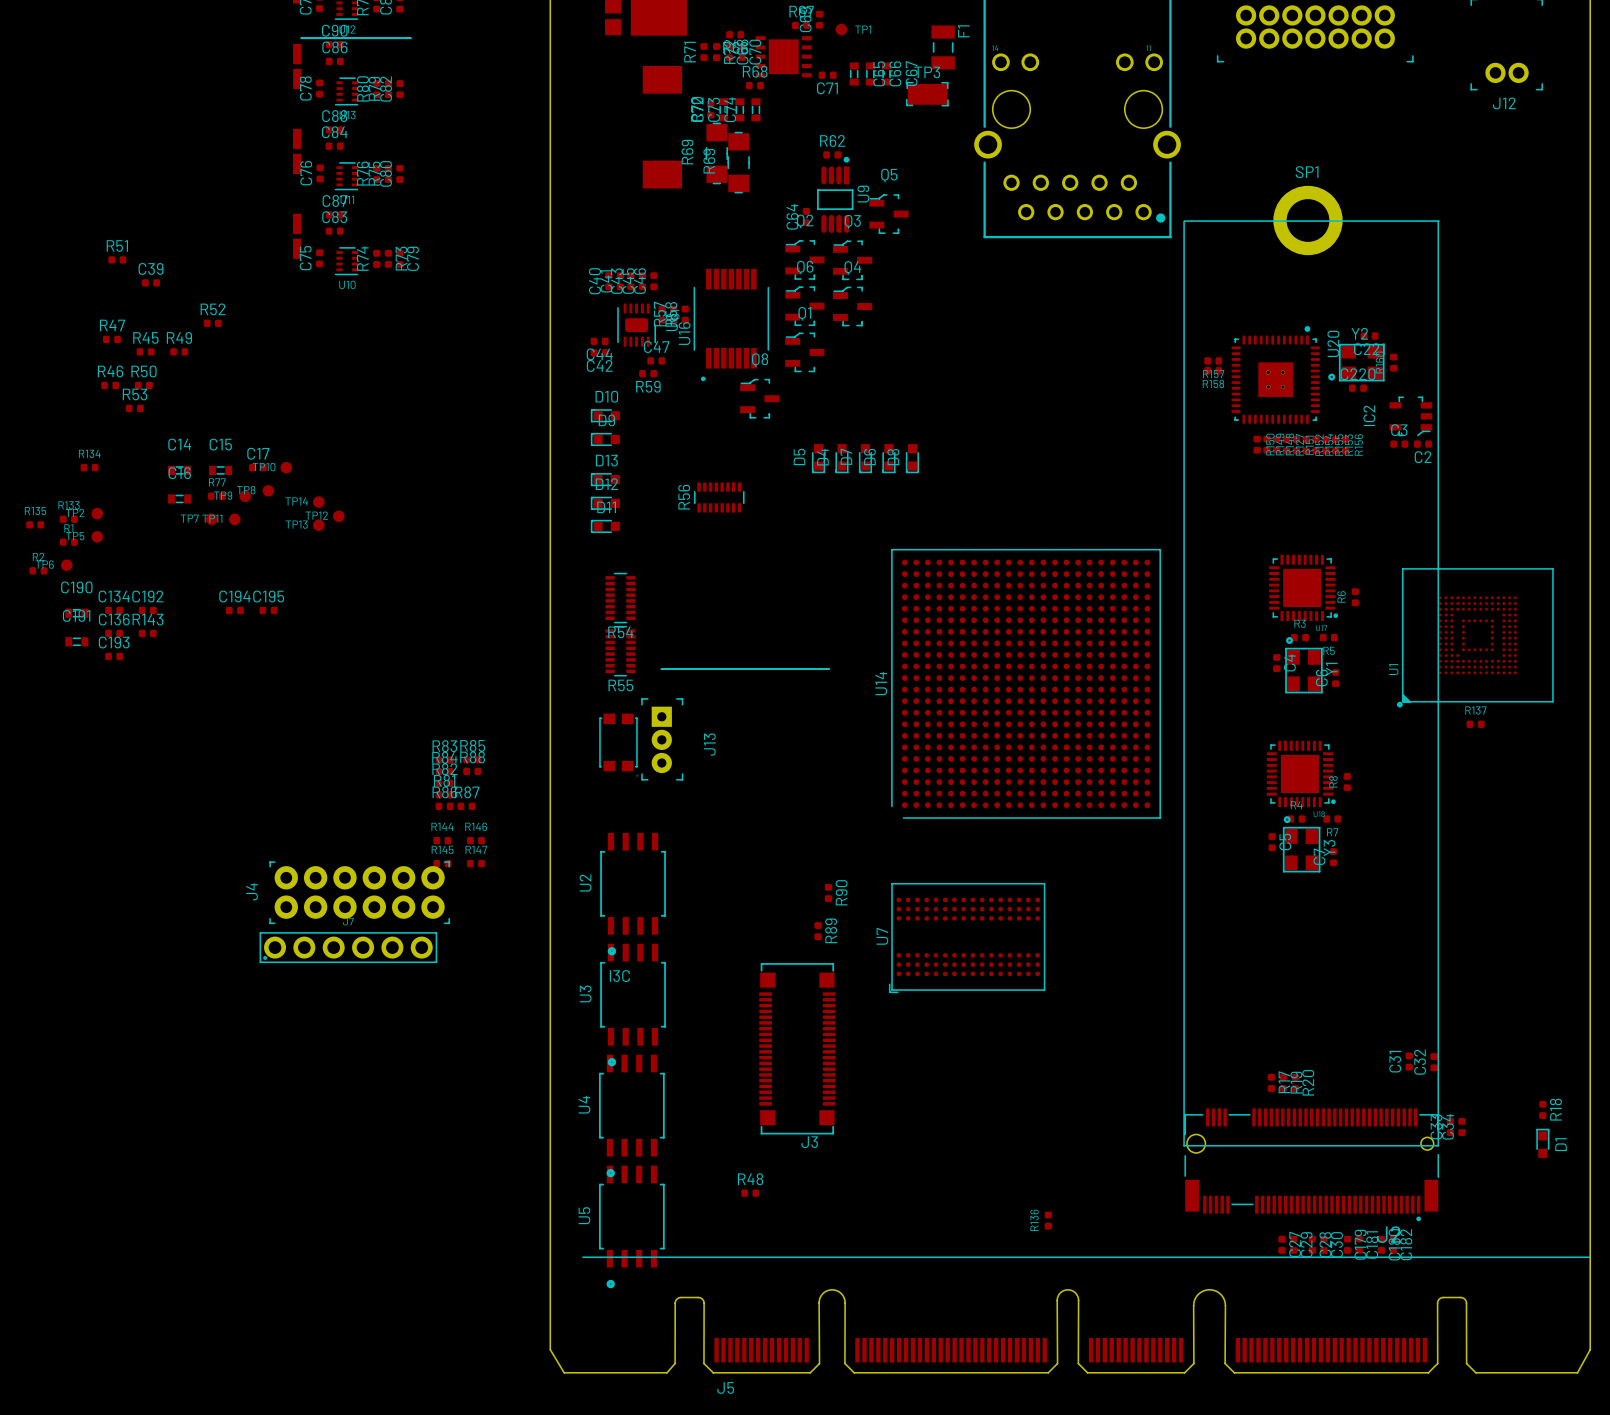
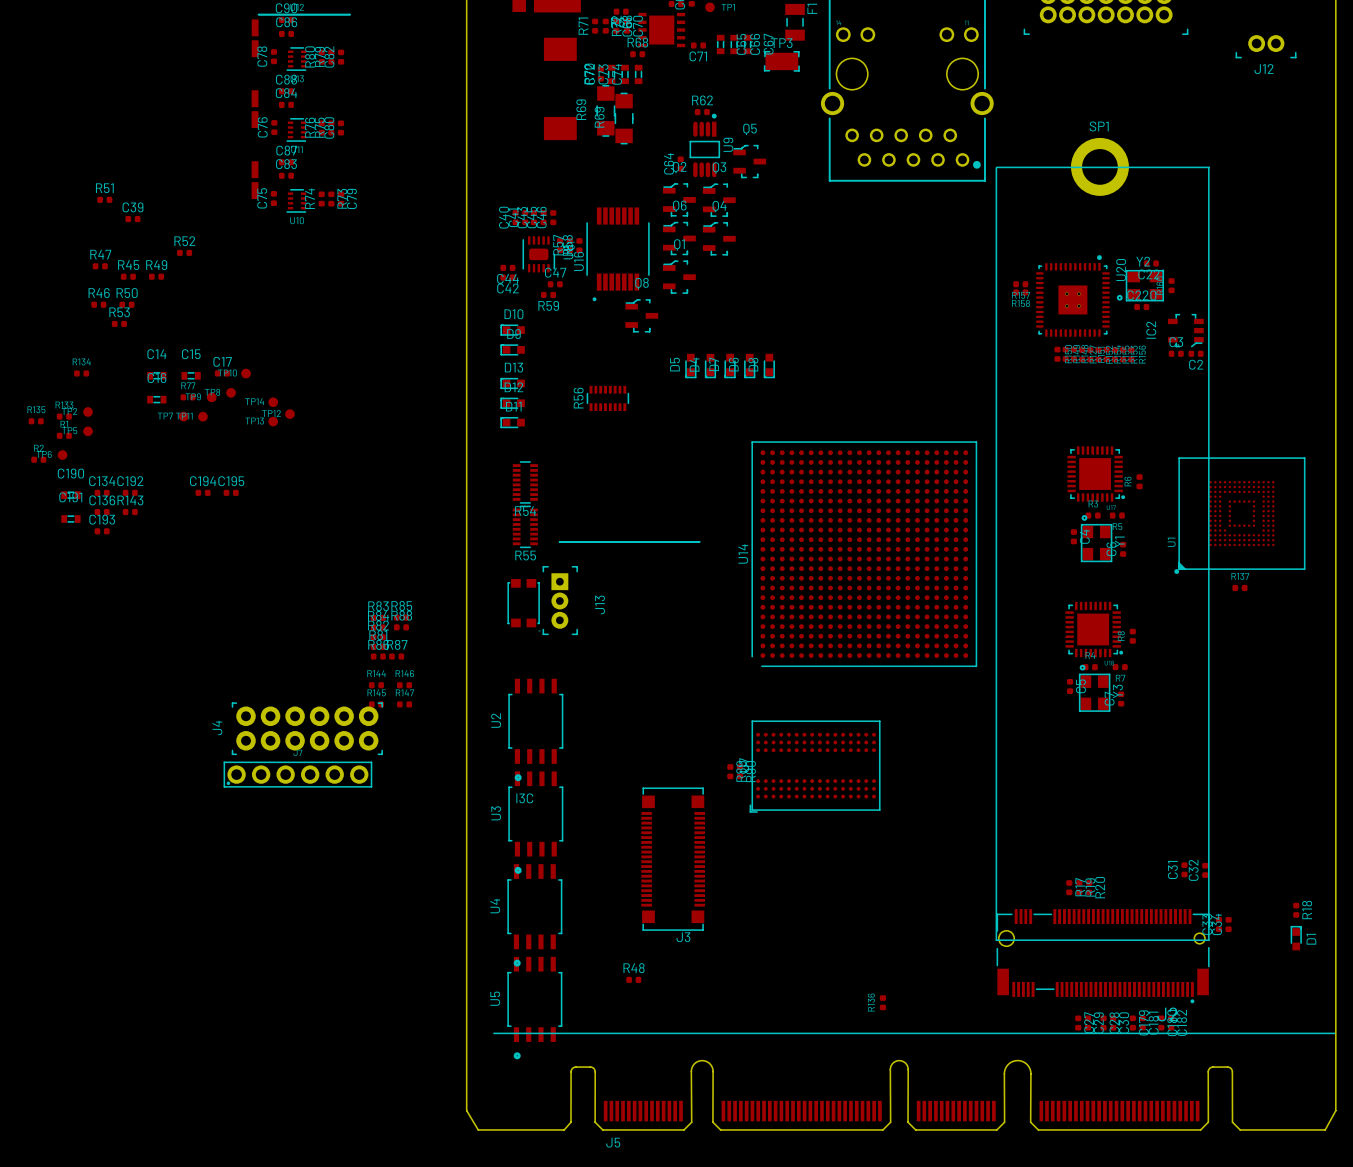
R90 position: (828, 892) -> (739, 771)
R89 position: (818, 931) -> (730, 771)

